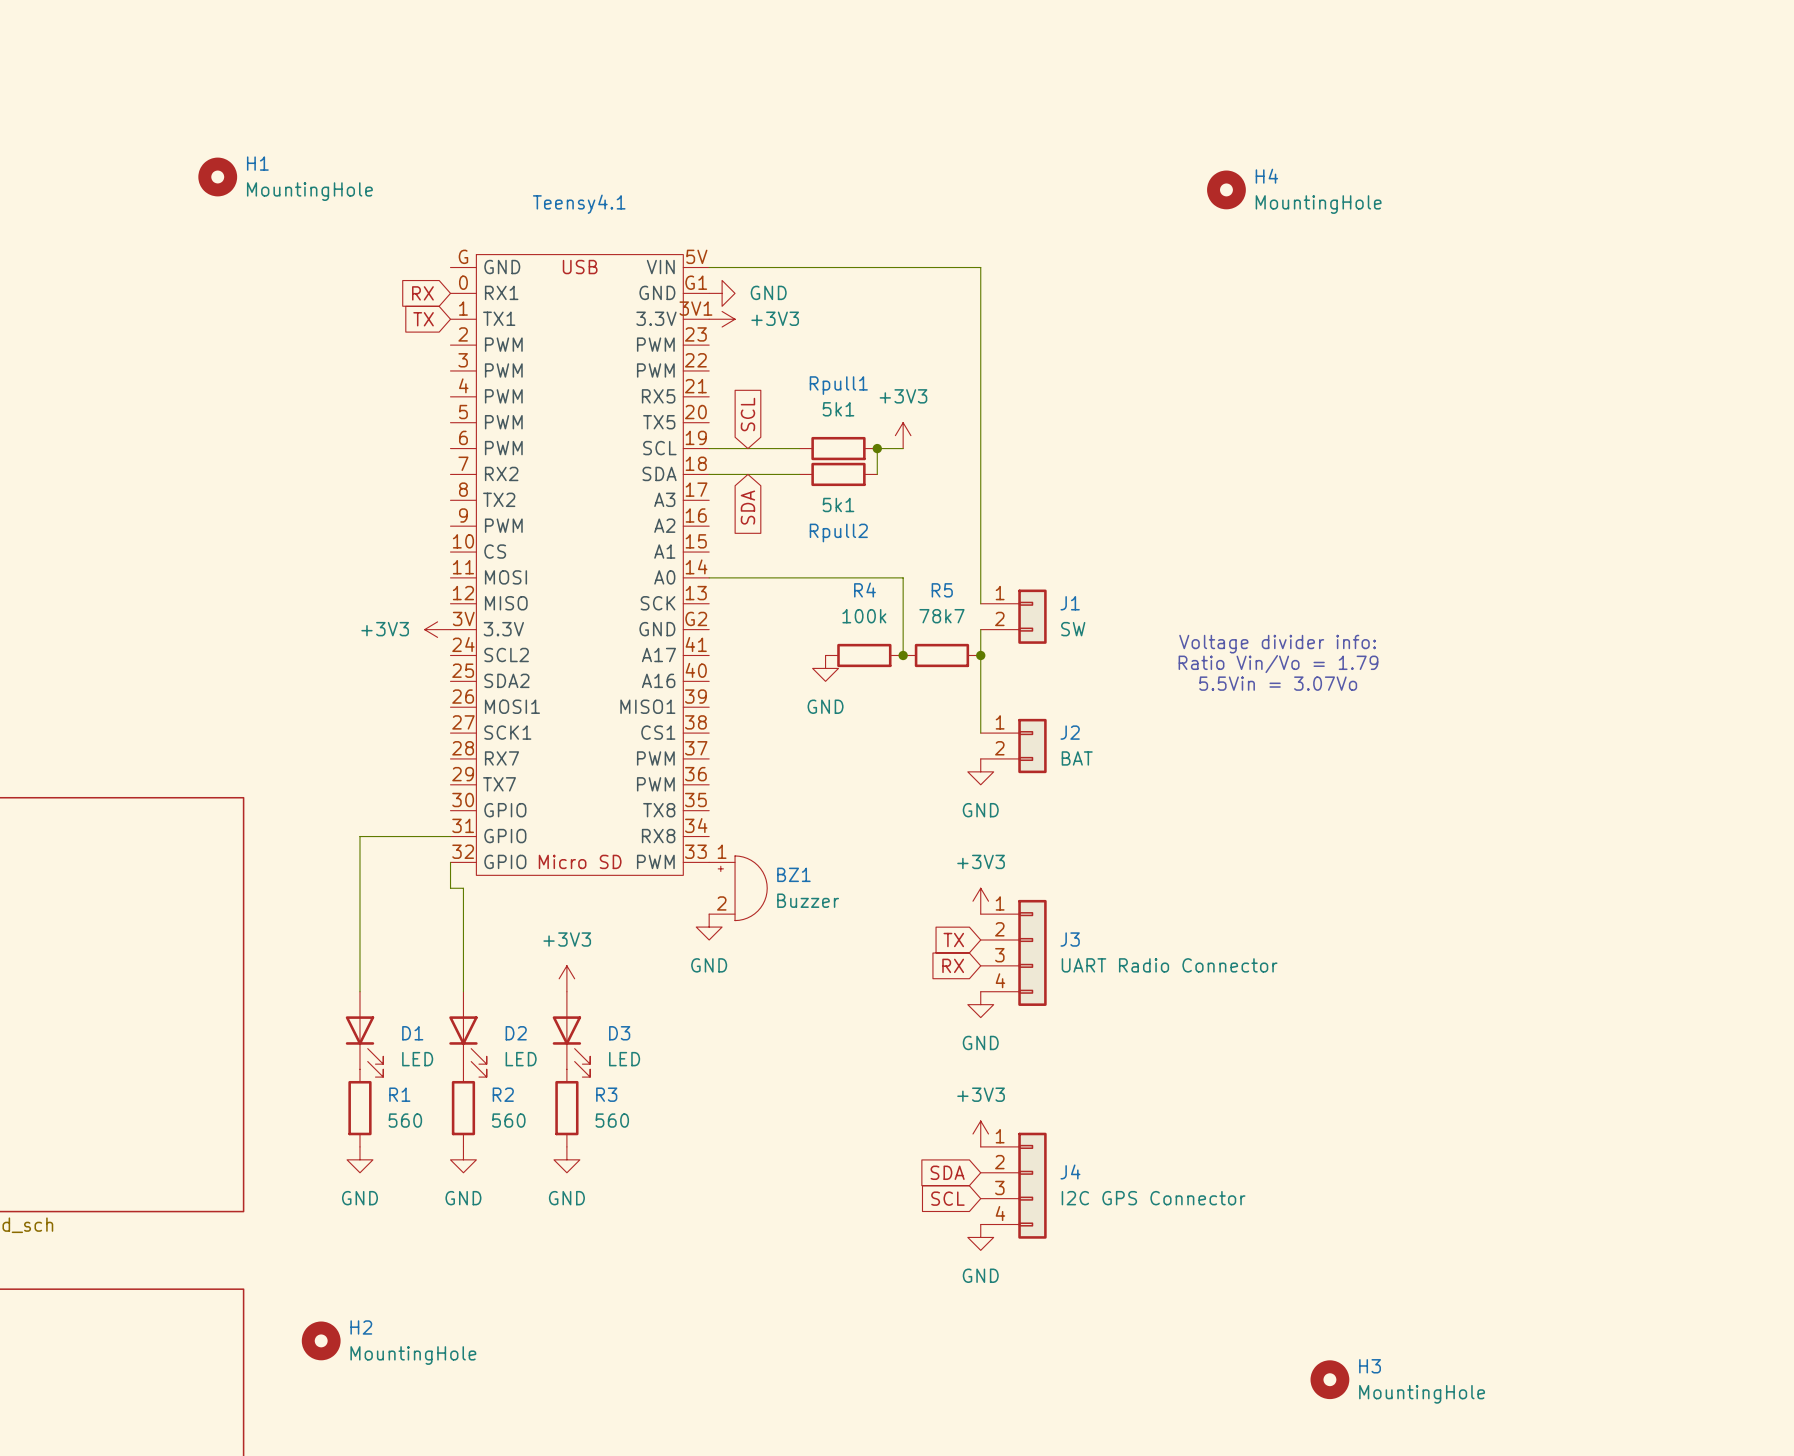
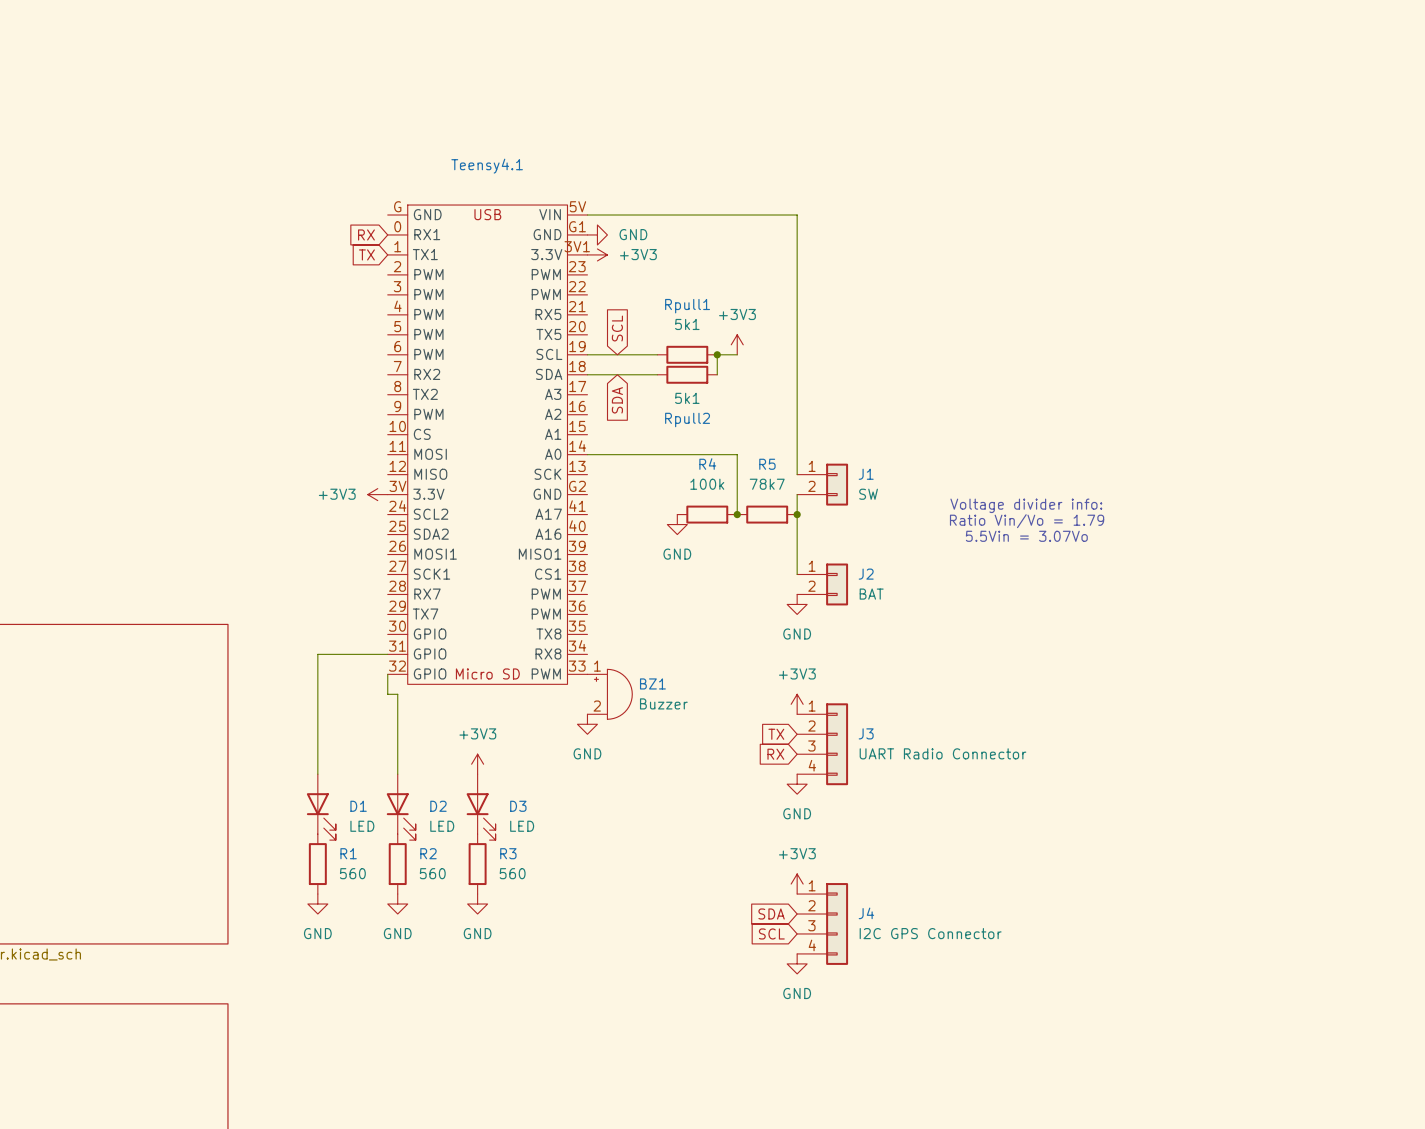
H1: MountingHole (217, 176) -> none
H4: MountingHole (1226, 189) -> none
H2: MountingHole (321, 1340) -> none
H3: MountingHole (1329, 1379) -> none

